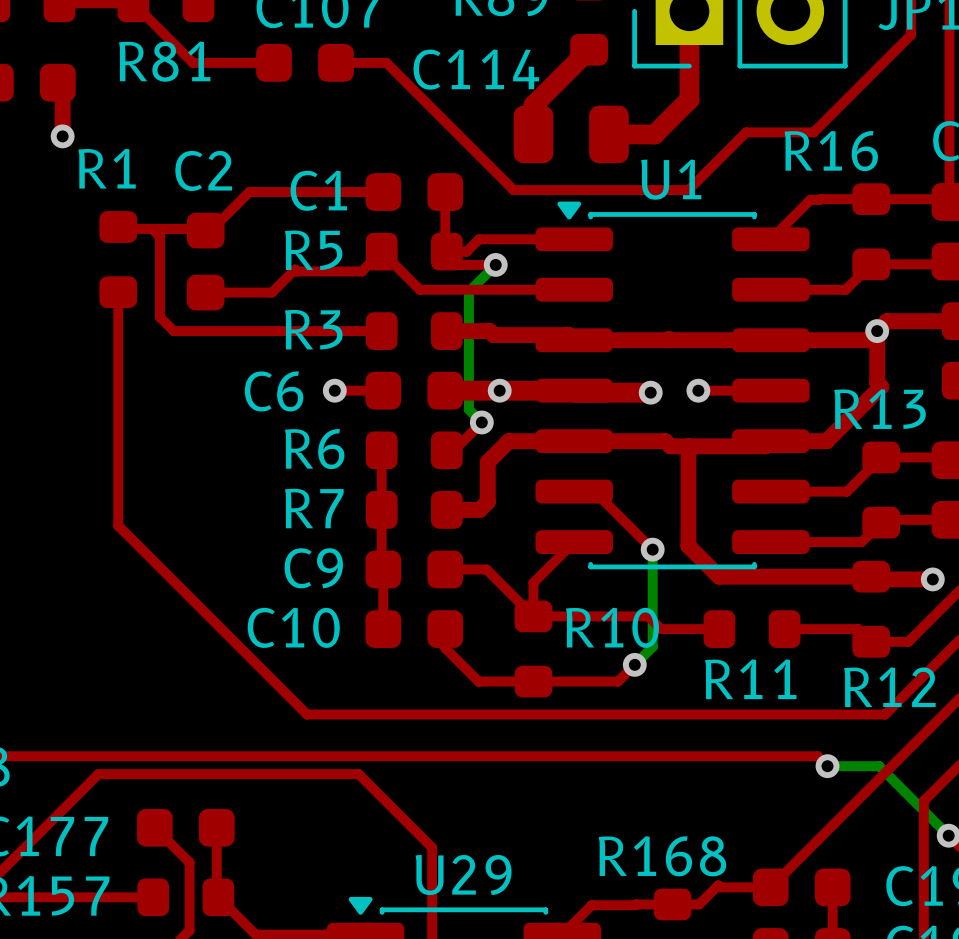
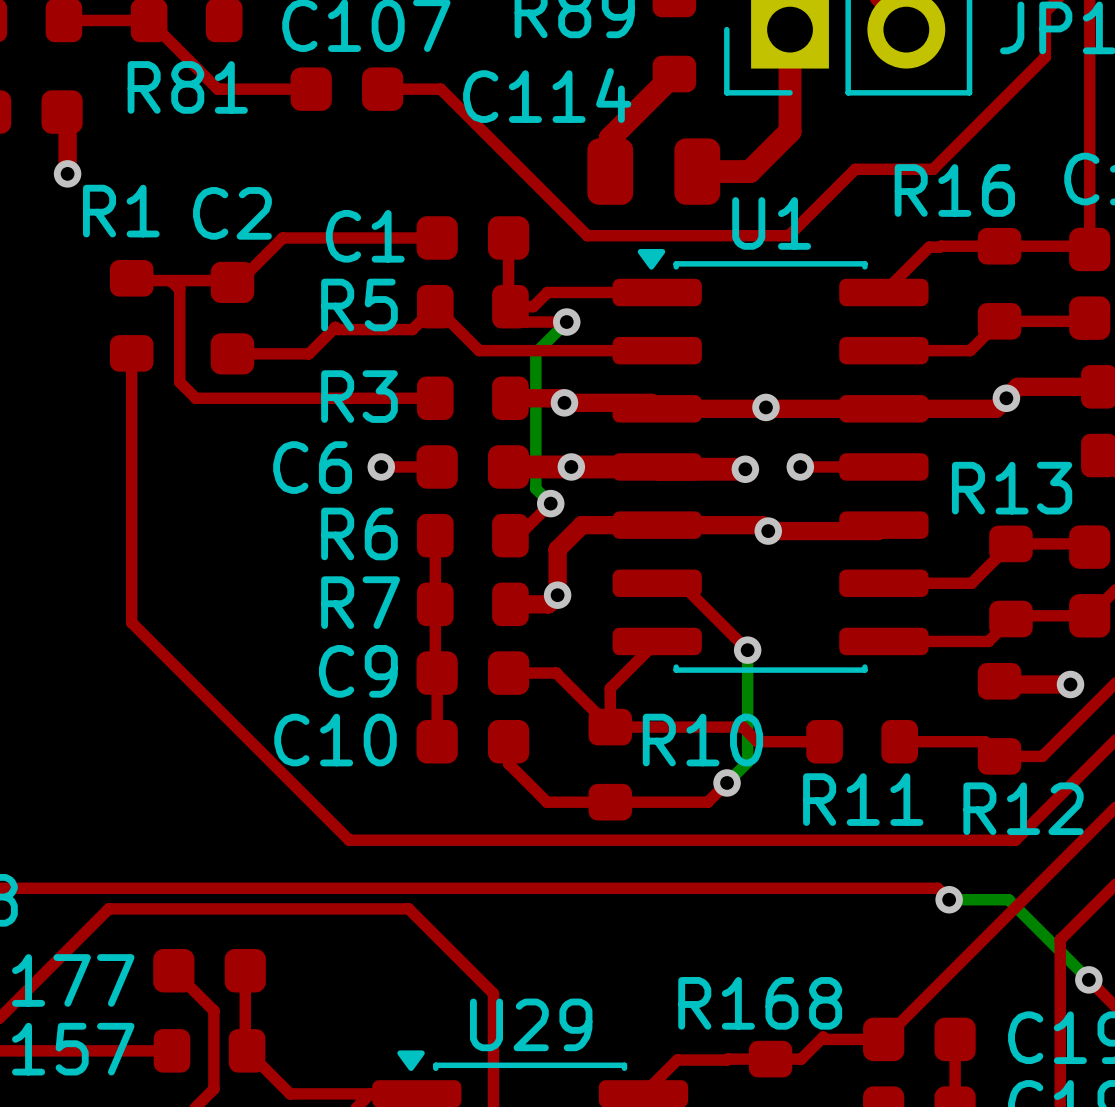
top track: (877, 331) (877, 382) (881, 386) (826, 441) (770, 441) -> none
via: none -> (564, 402)
via: none -> (765, 407)
via: none -> (768, 531)
top track: (688, 446) (688, 546) (719, 576) (871, 576) -> none
via: none -> (557, 595)

